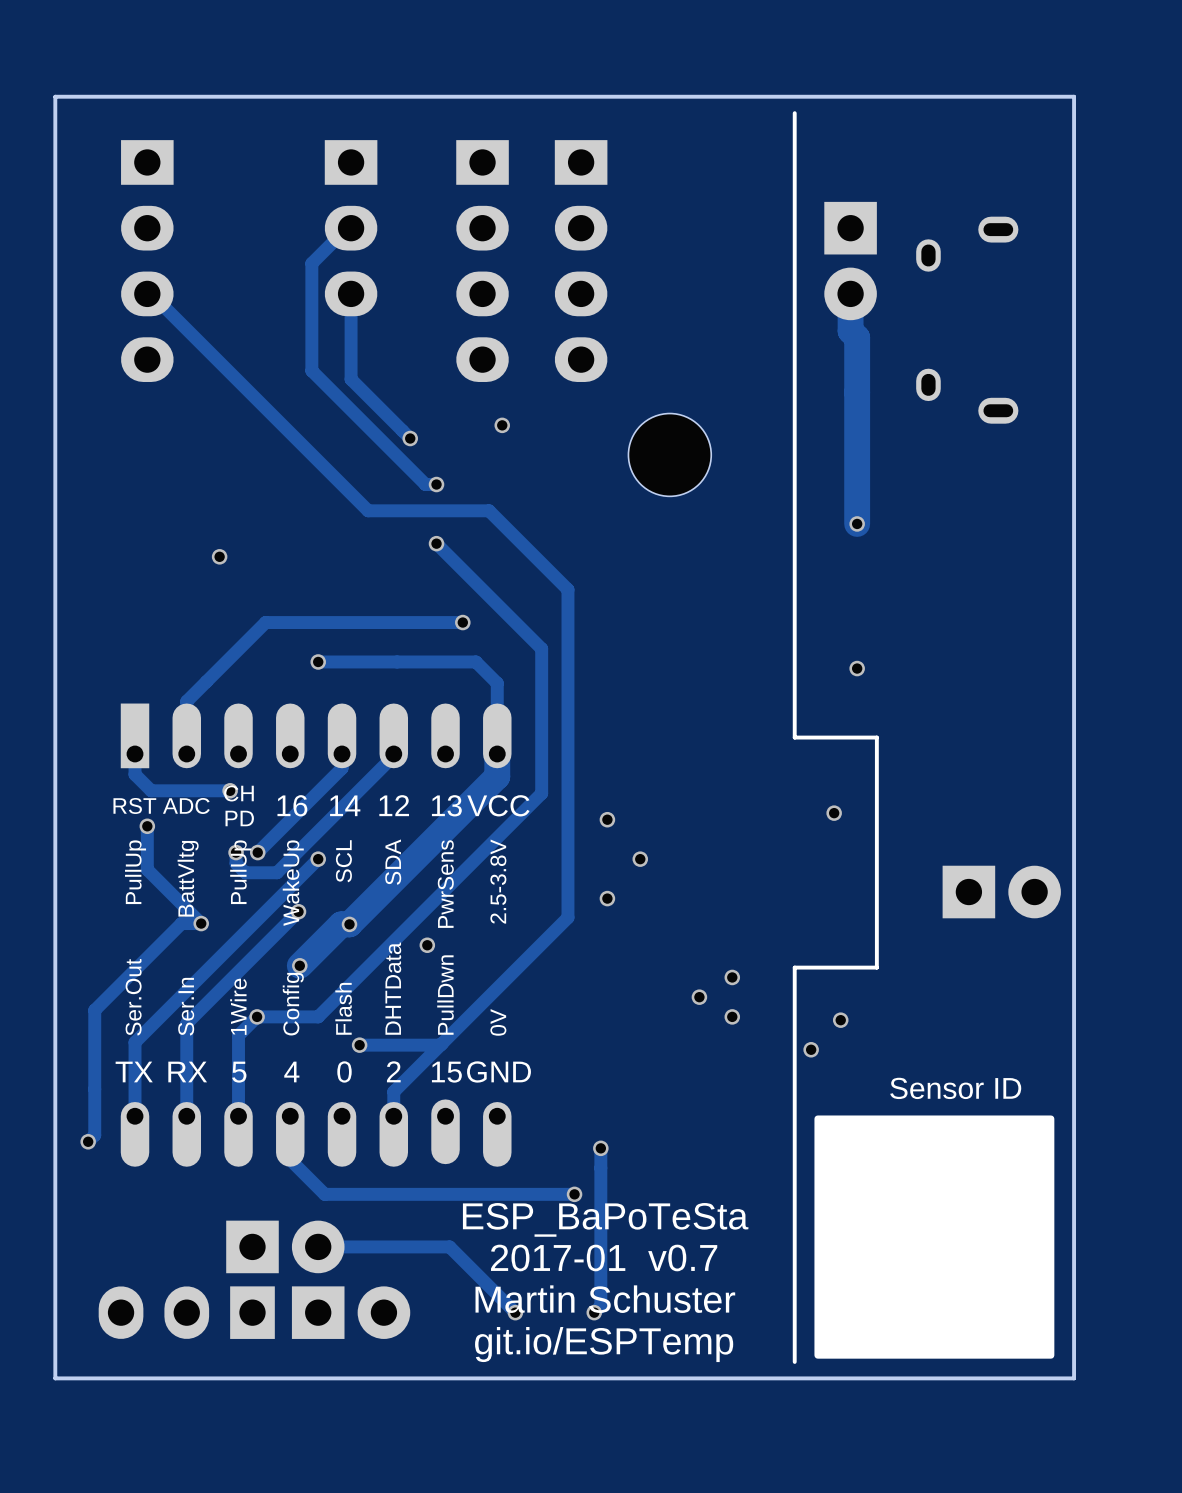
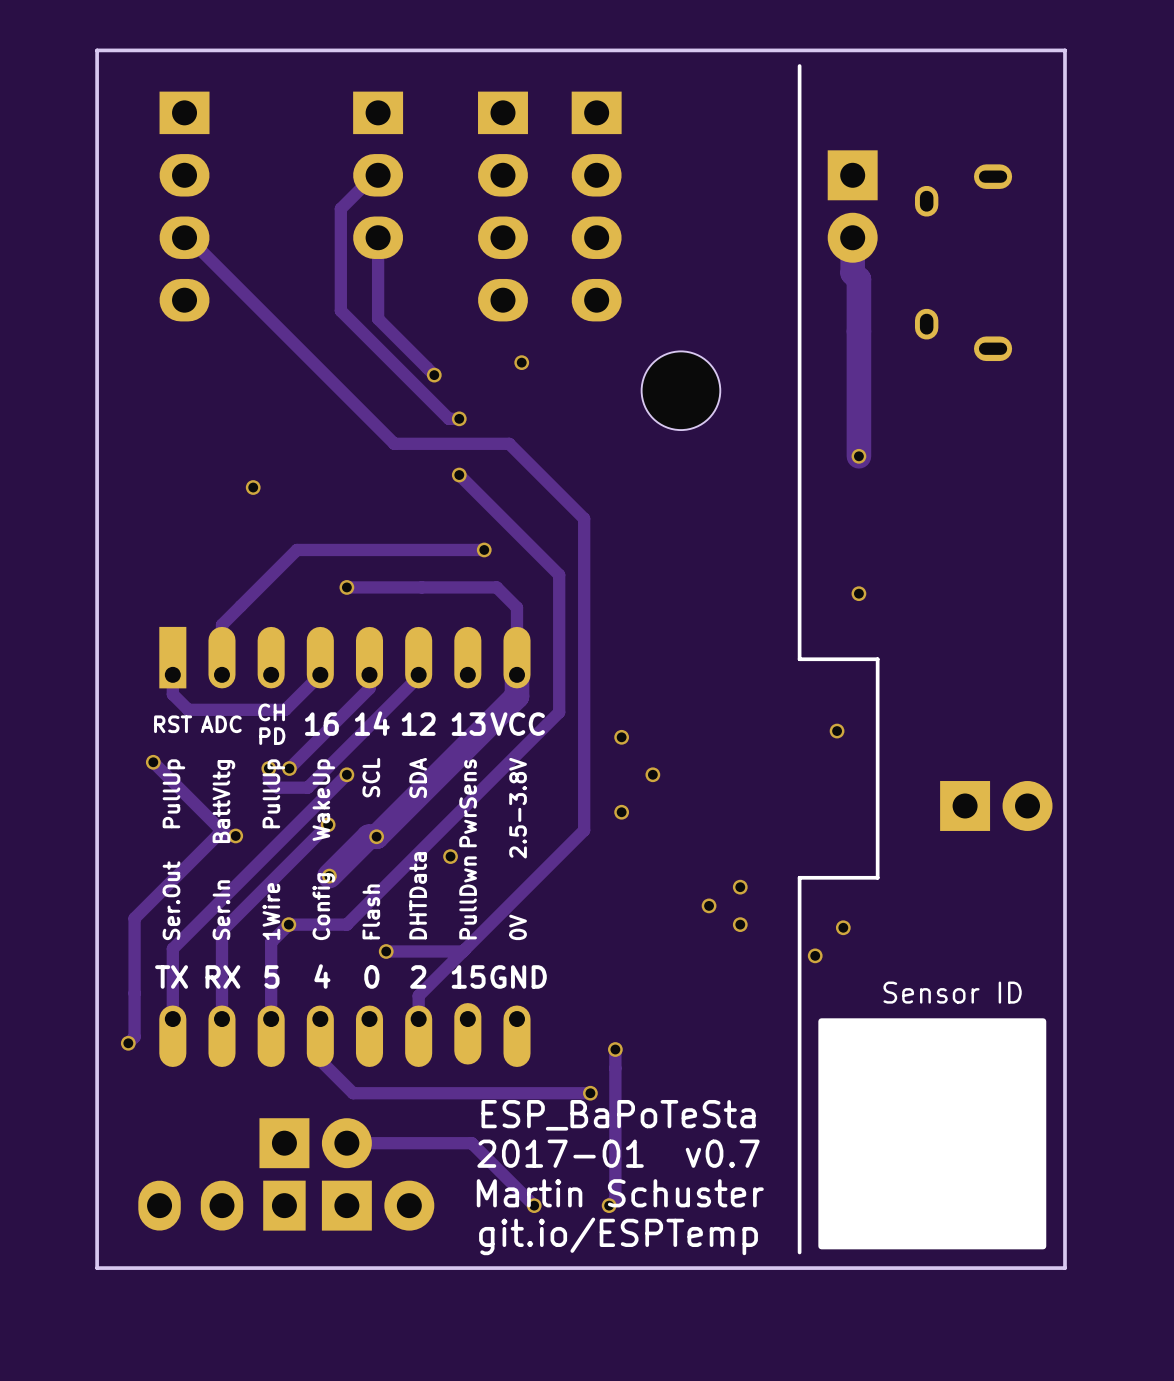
track: none -> (320, 674) (285, 709) (263, 709)
via: (230, 790) -> none
track: (147, 826) (147, 869) (201, 923) -> none
via position: (147, 826) -> (153, 762)
track: none -> (153, 762) (226, 835)

